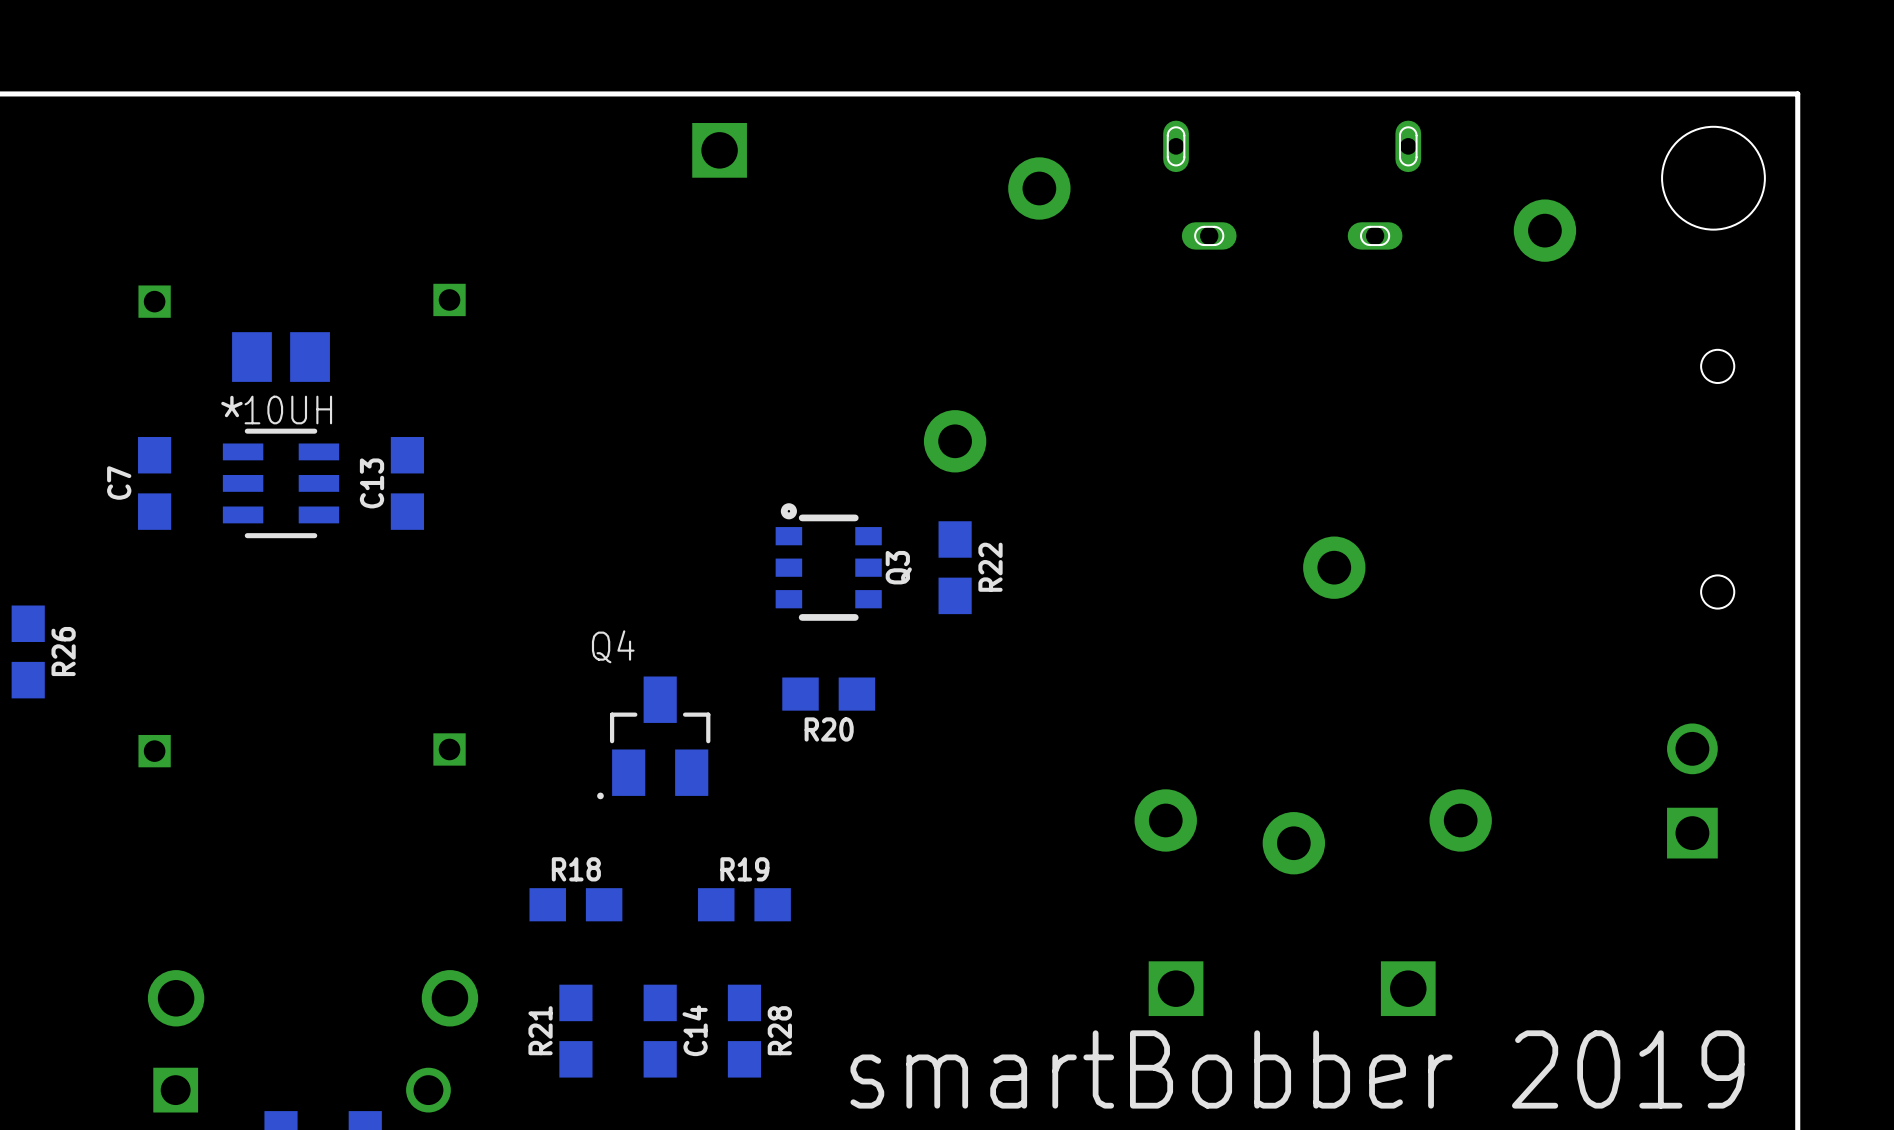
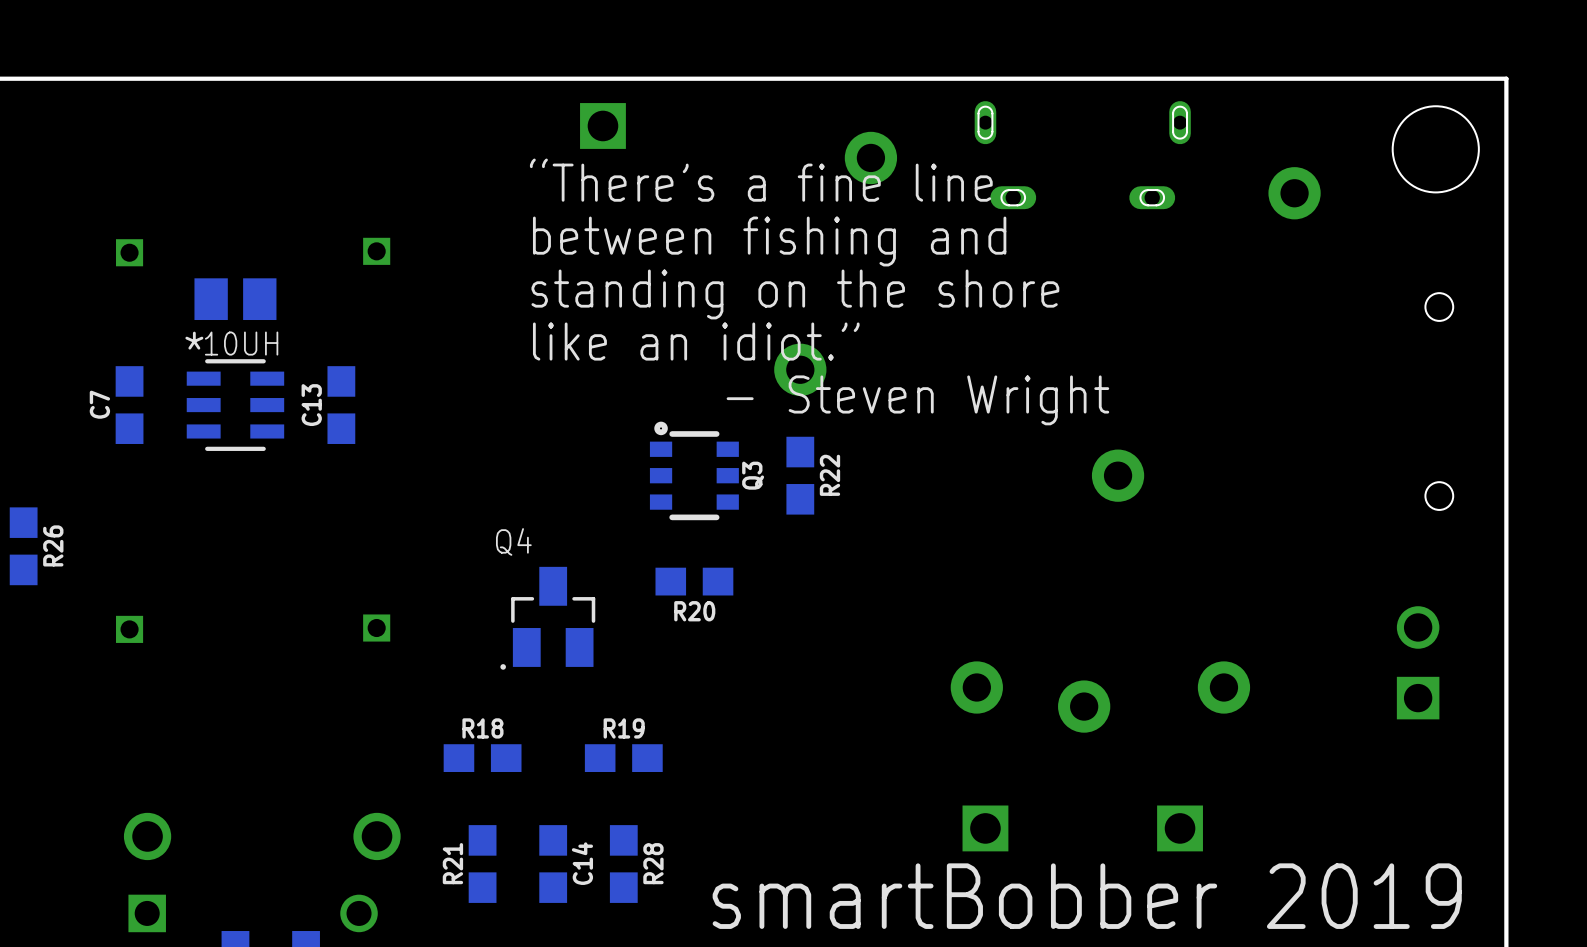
text: none -> “There’s a fine line (761, 180)
text: none -> between fishing and (769, 241)
text: none -> standing on the shore (795, 294)
text: none -> like an idiot.” (696, 341)
text: none -> - Steven Wright (917, 400)

